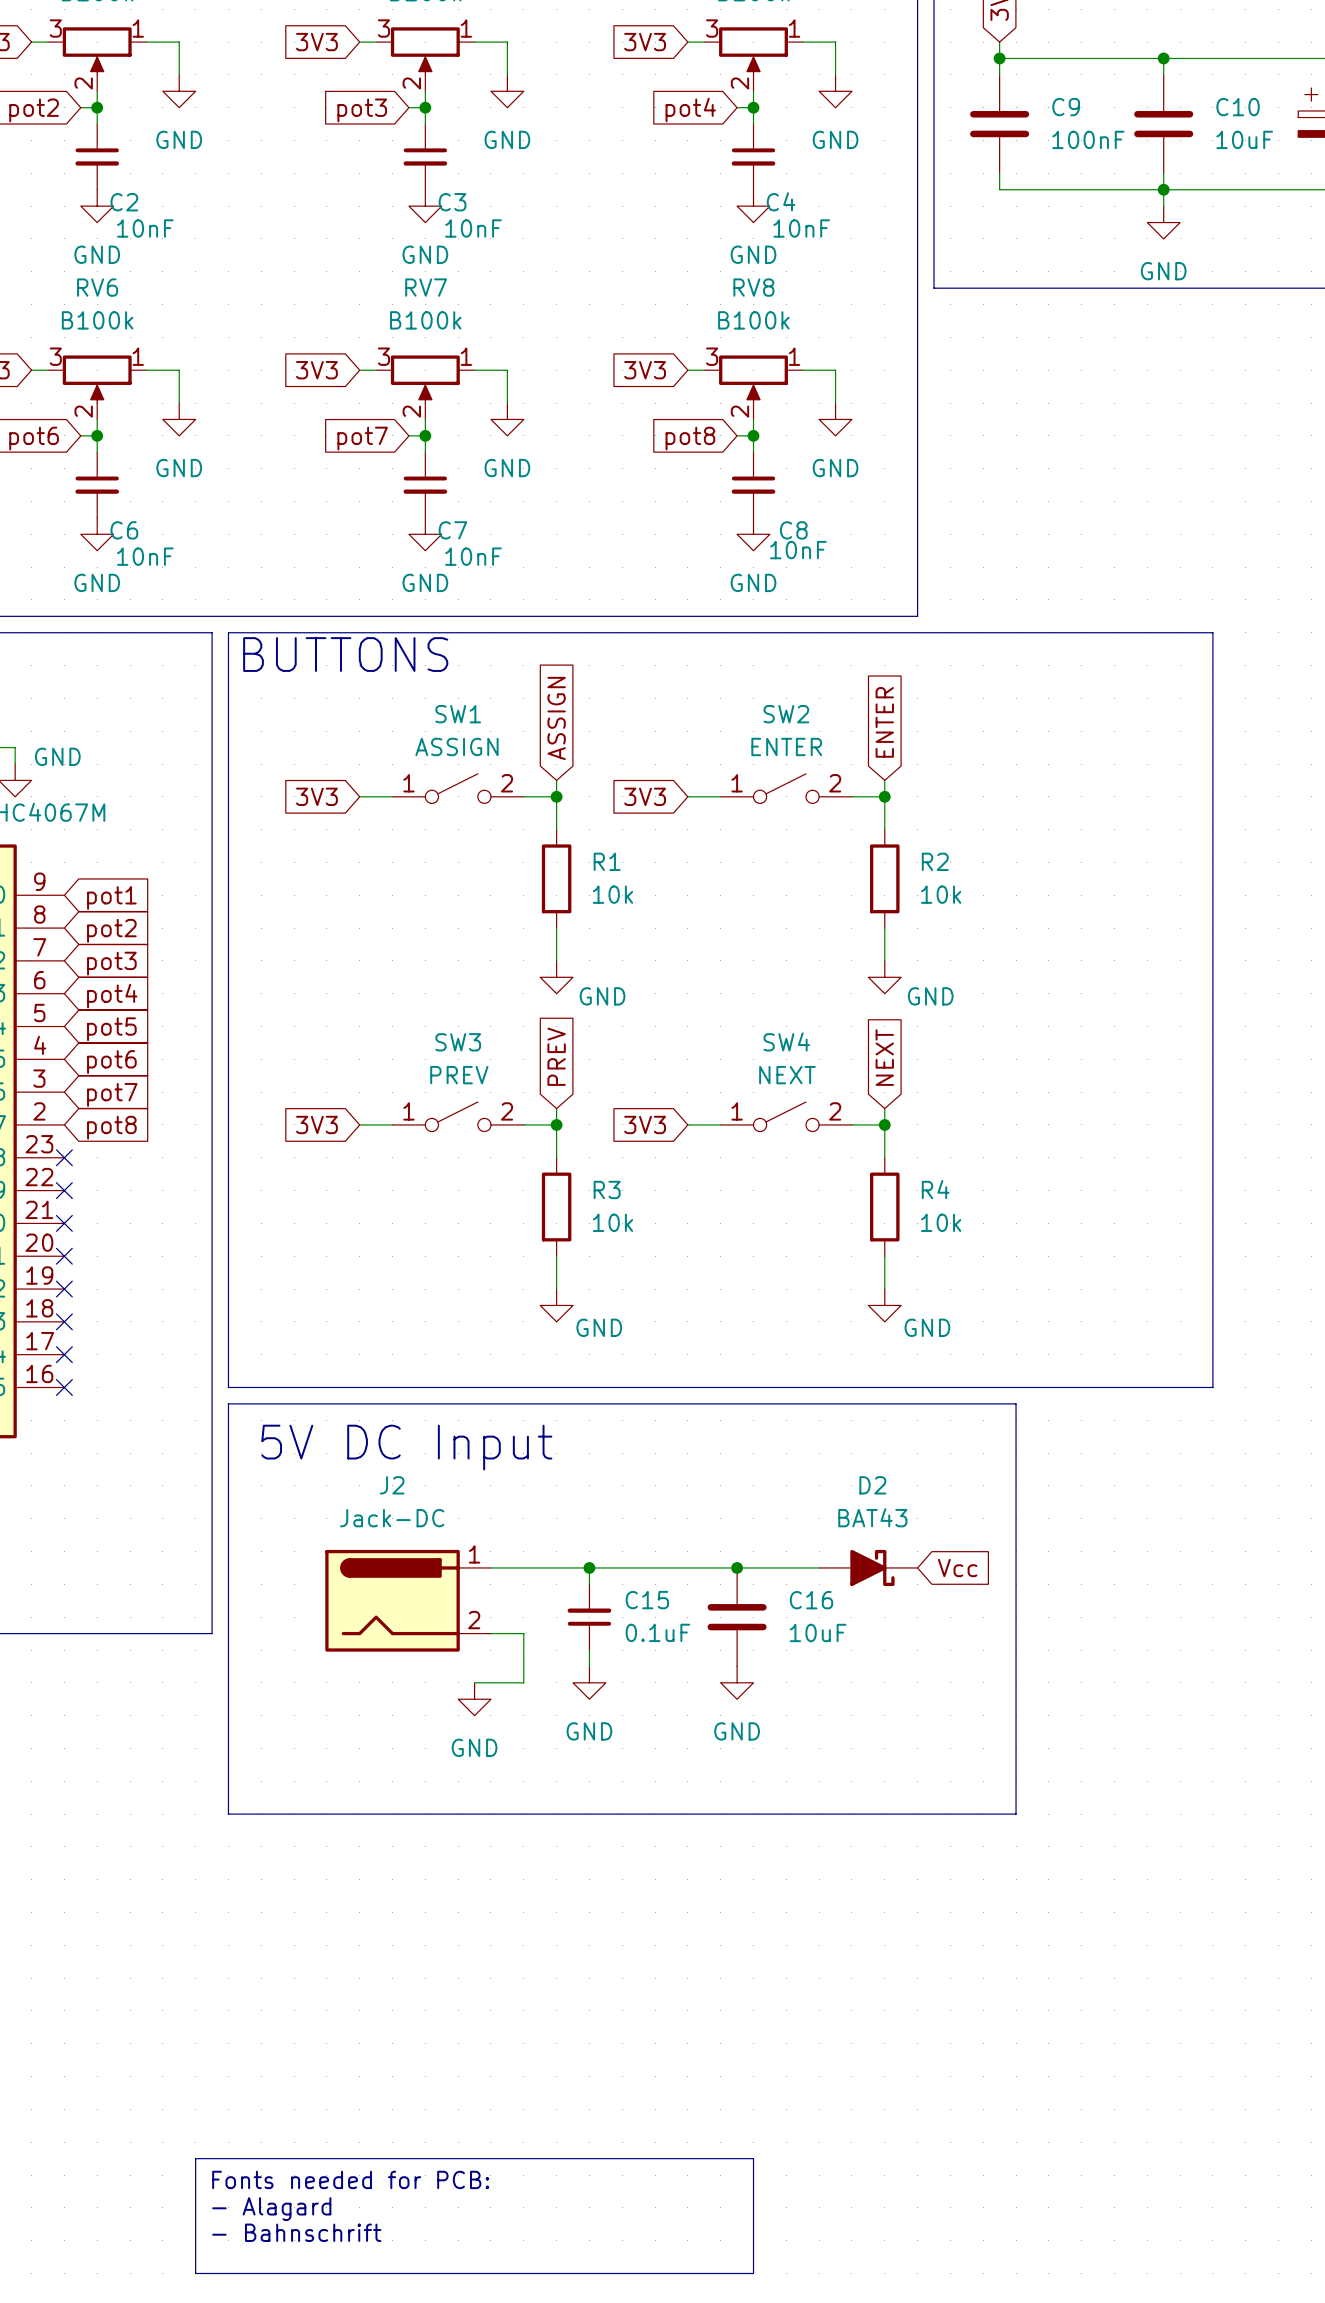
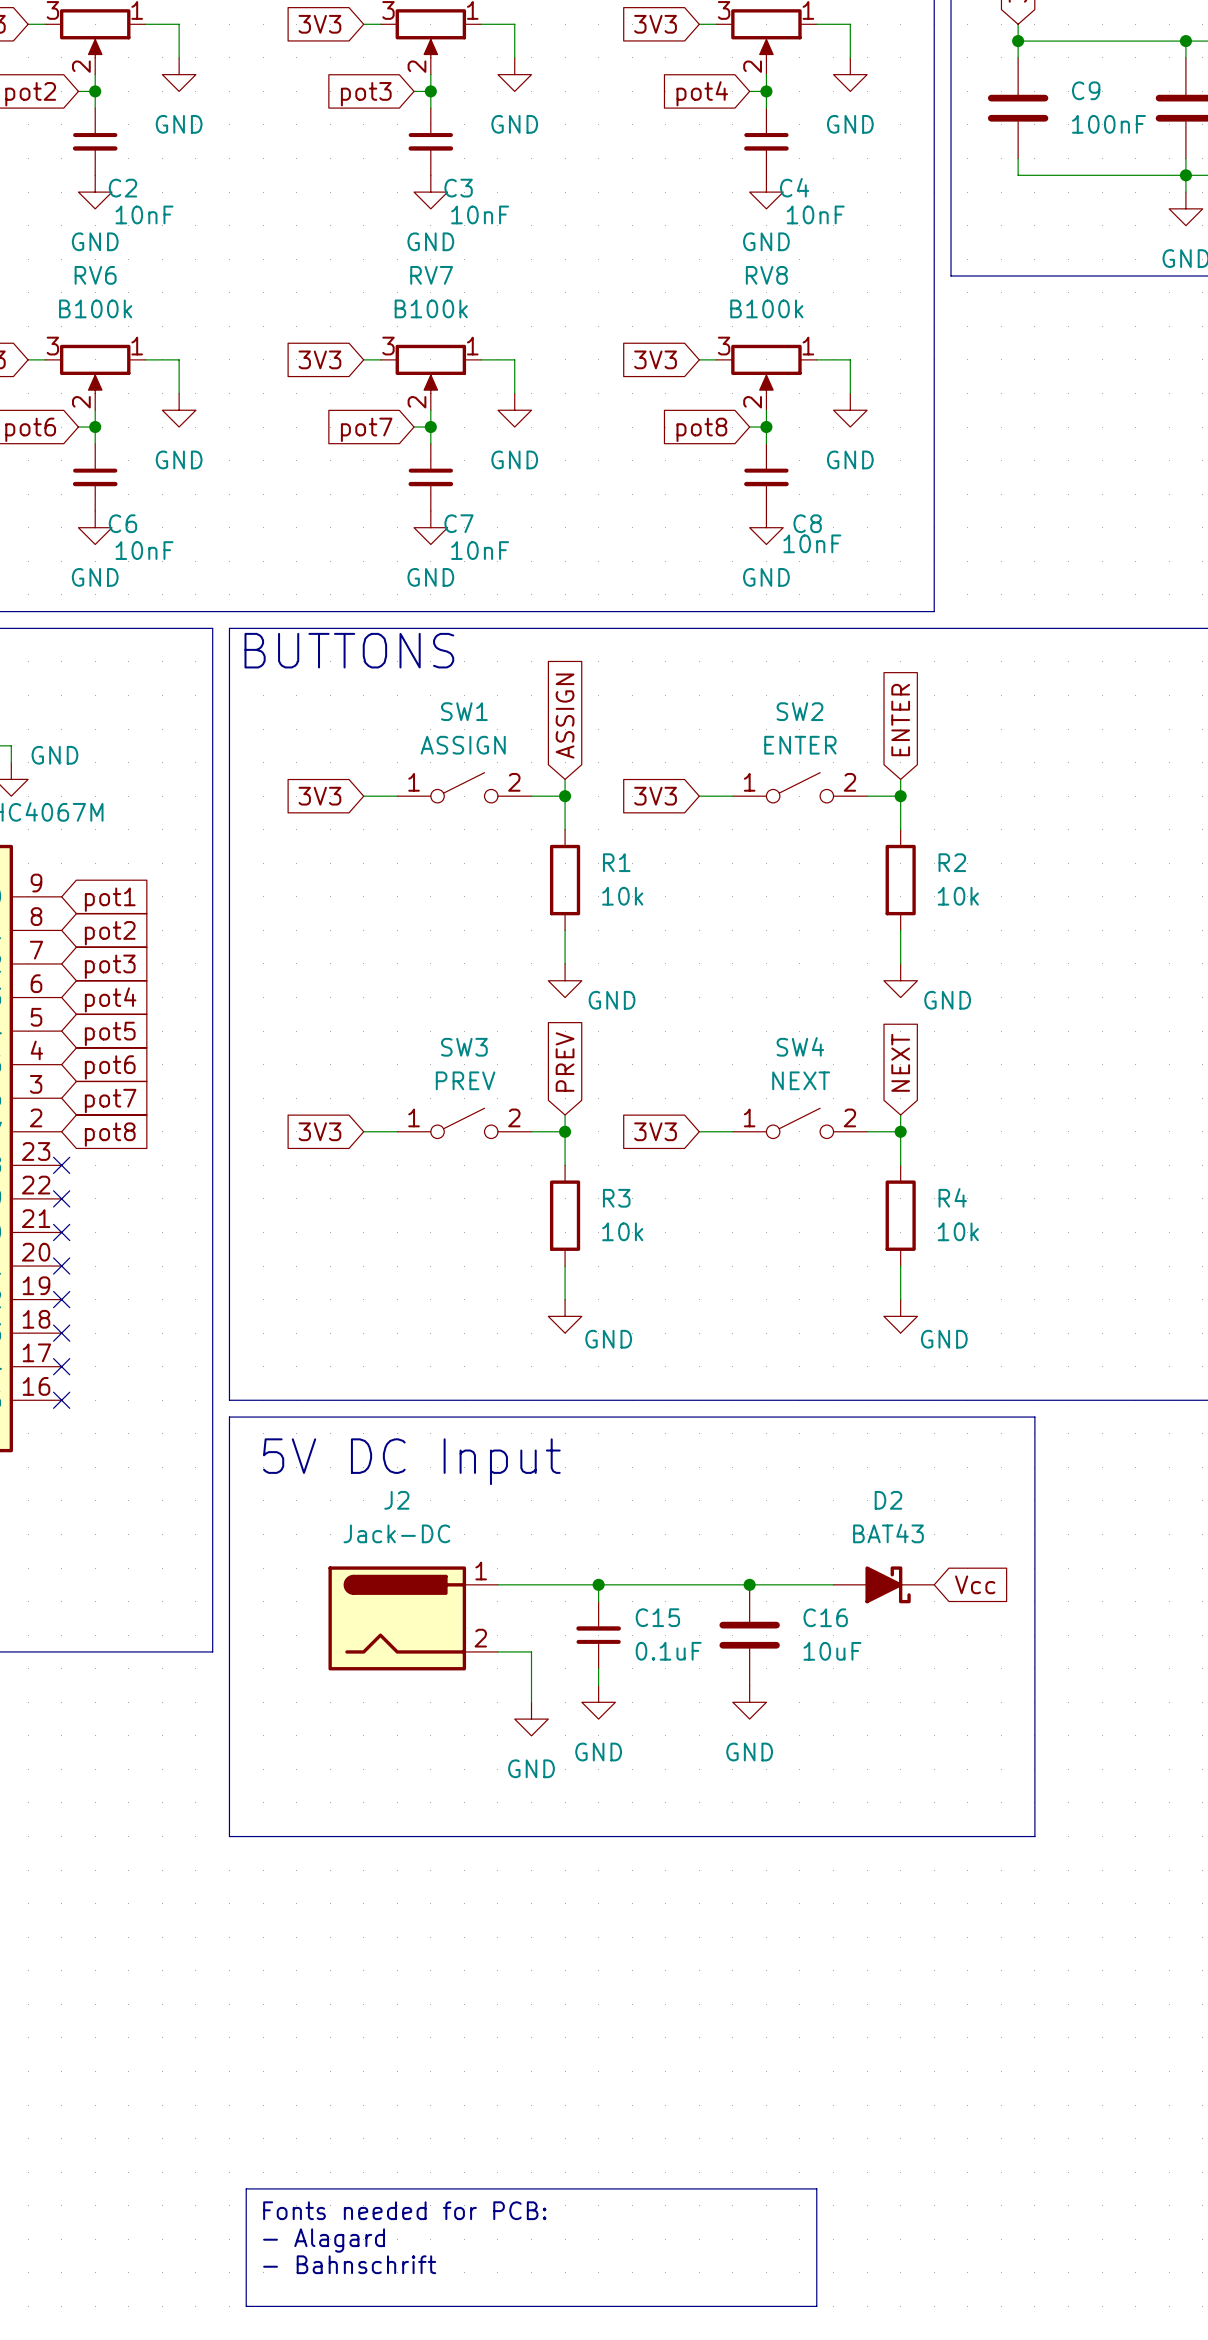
wire: (474, 1682) (523, 1682) -> none
power symbol position: GND (474, 1699) -> GND (531, 1719)
line: (244, 2158) (195, 2158) (195, 2273) (244, 2273) -> (246, 2188) (246, 2306)
line: (753, 2158) (753, 2273) -> (766, 2188) (816, 2188) (816, 2306) (766, 2306)
text position: Fonts needed for PCB: (350, 2179) -> Fonts needed for PCB: (404, 2210)
text position: - Alagard (271, 2209) -> - Alagard (324, 2240)
text position: - Bahnschrift (296, 2232) -> - Bahnschrift (349, 2264)

